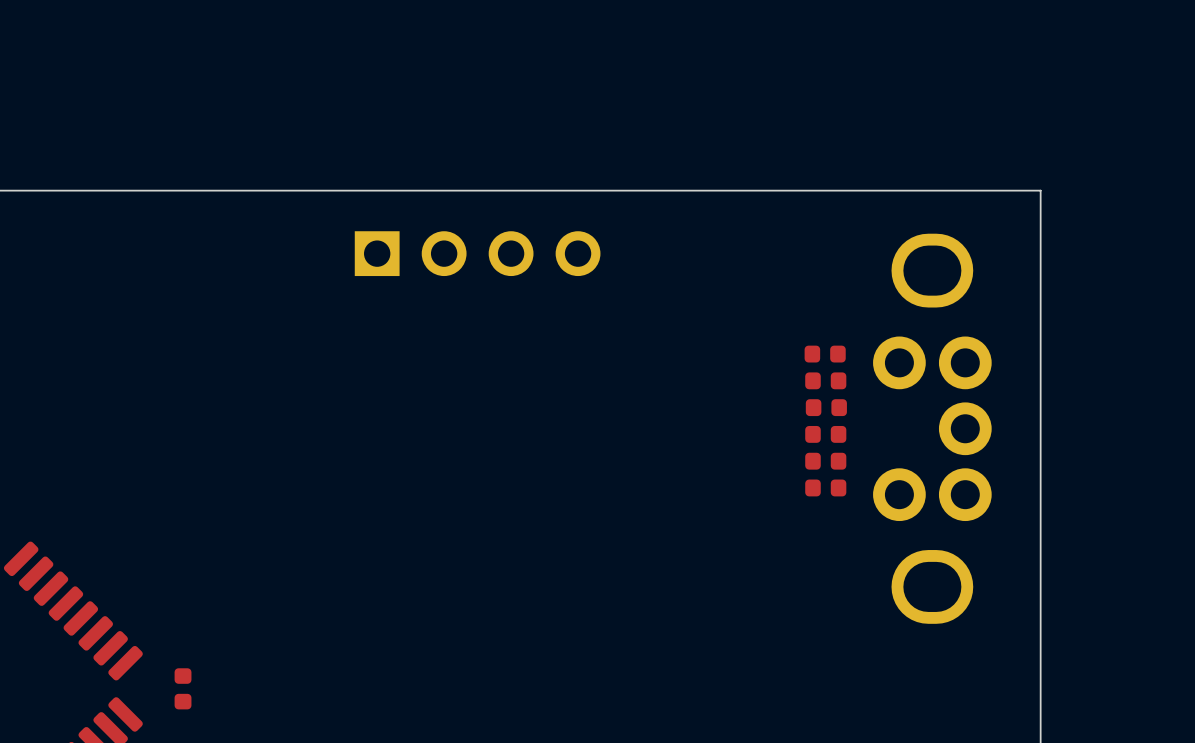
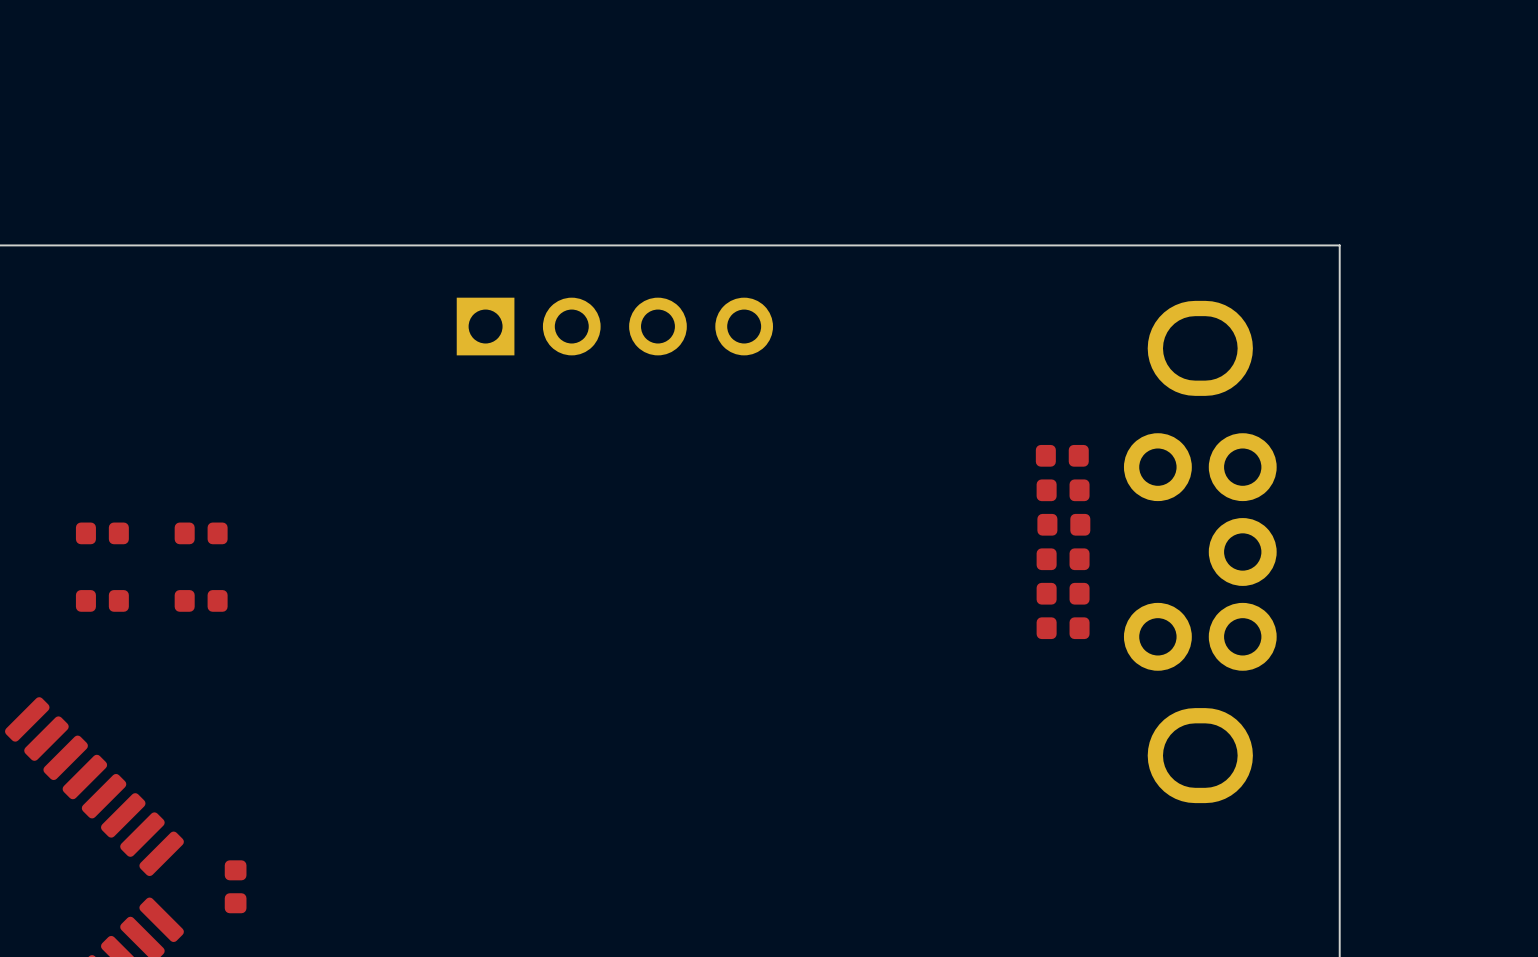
part: none -> (102, 533)
part: none -> (201, 533)
part: none -> (102, 600)
part: none -> (201, 600)

